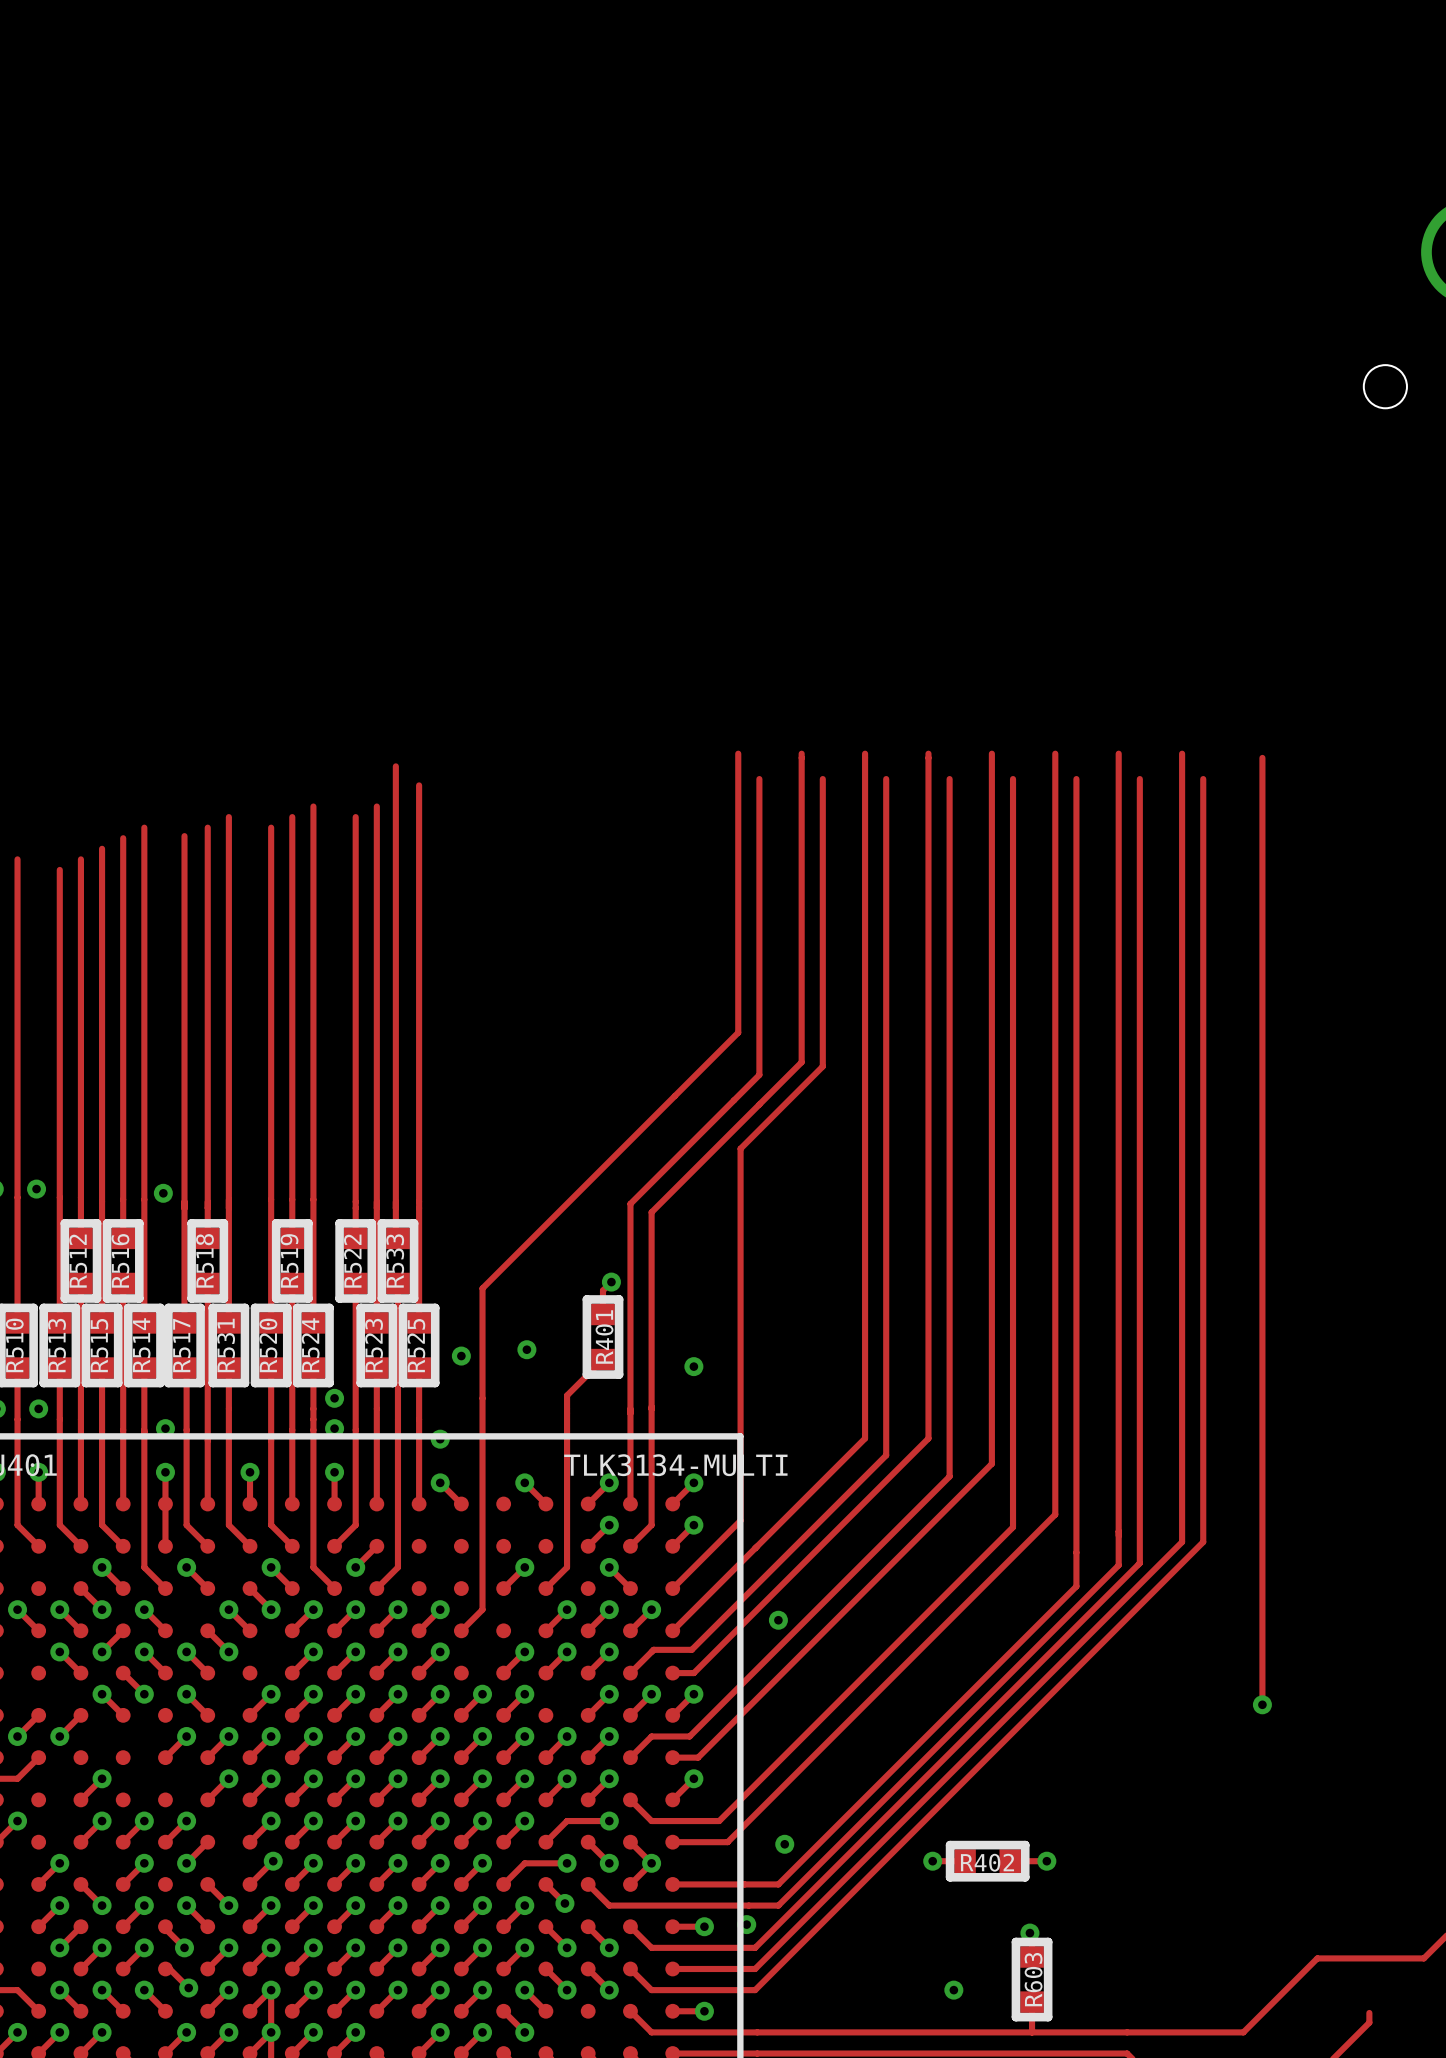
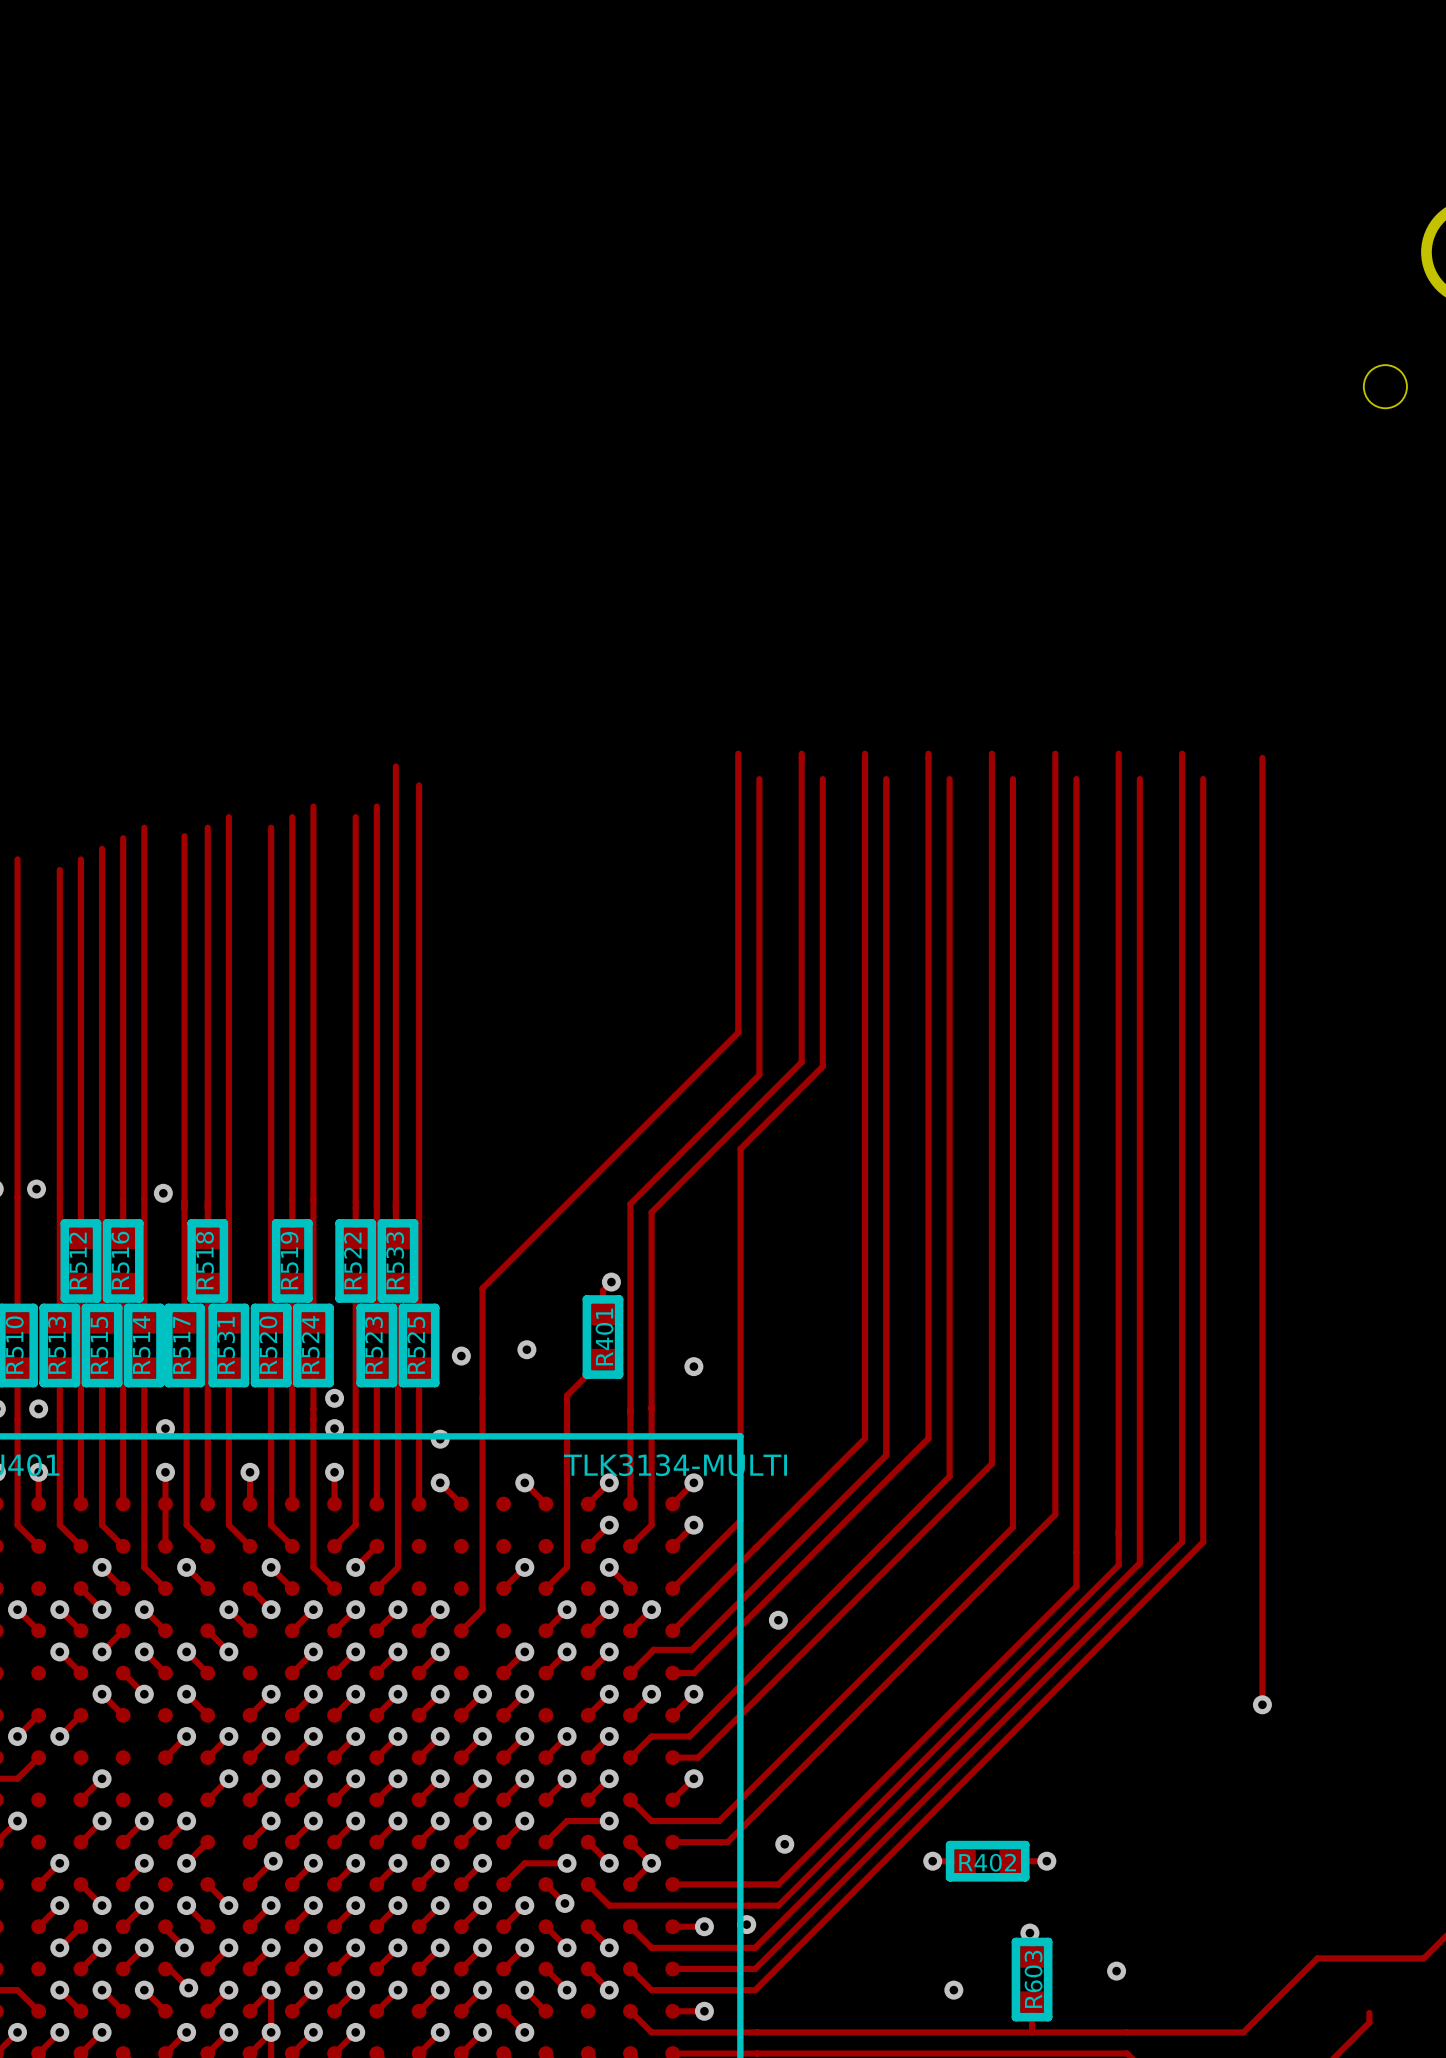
via: none -> (1116, 1971)

